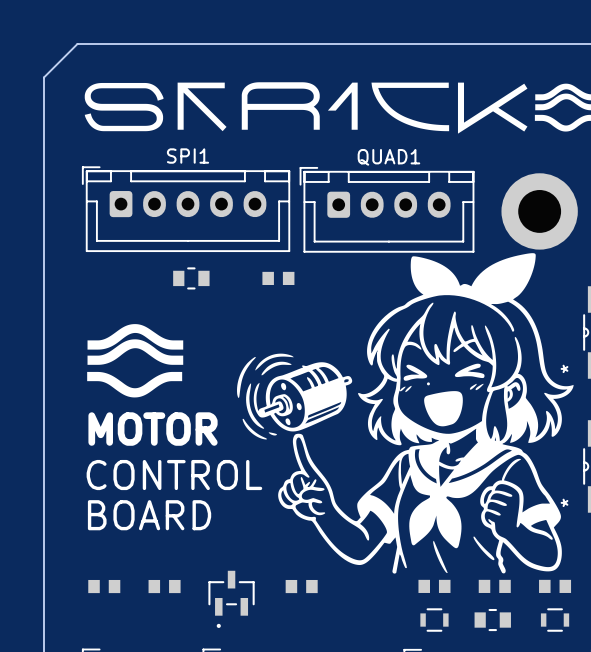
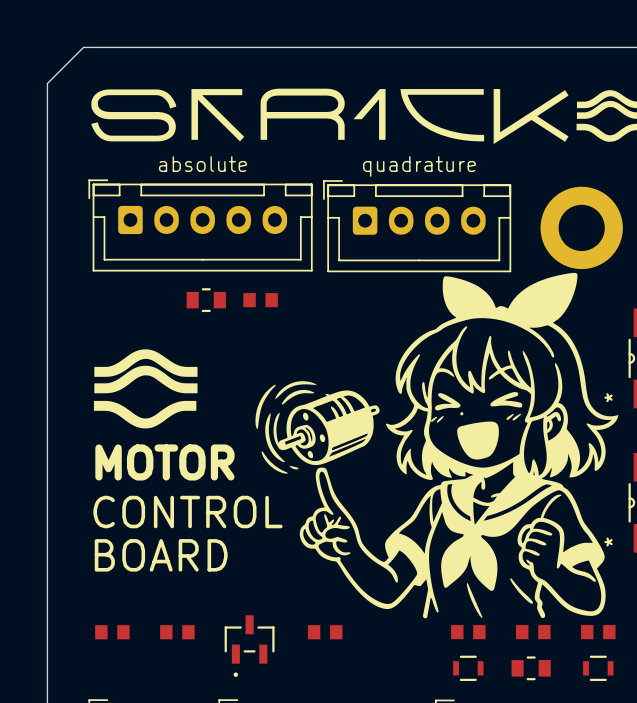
text: none -> absolute (202, 164)
text: none -> quadrature (419, 166)
SPI1 name: SPI1 (188, 156) -> none
QUAD1 name: QUAD1 (388, 157) -> none
part position: (278, 278) -> (260, 300)

